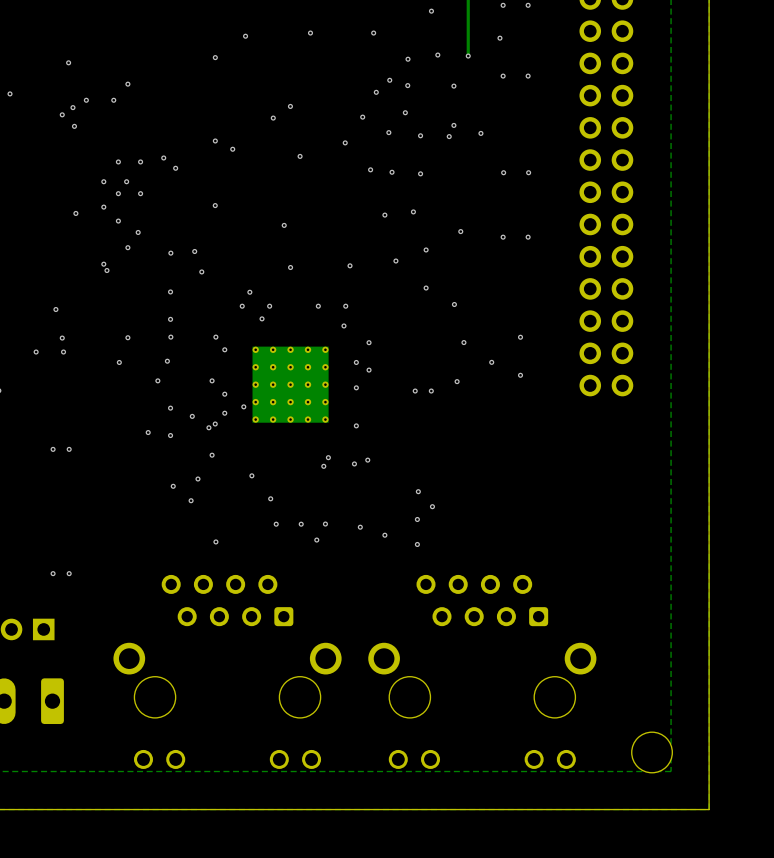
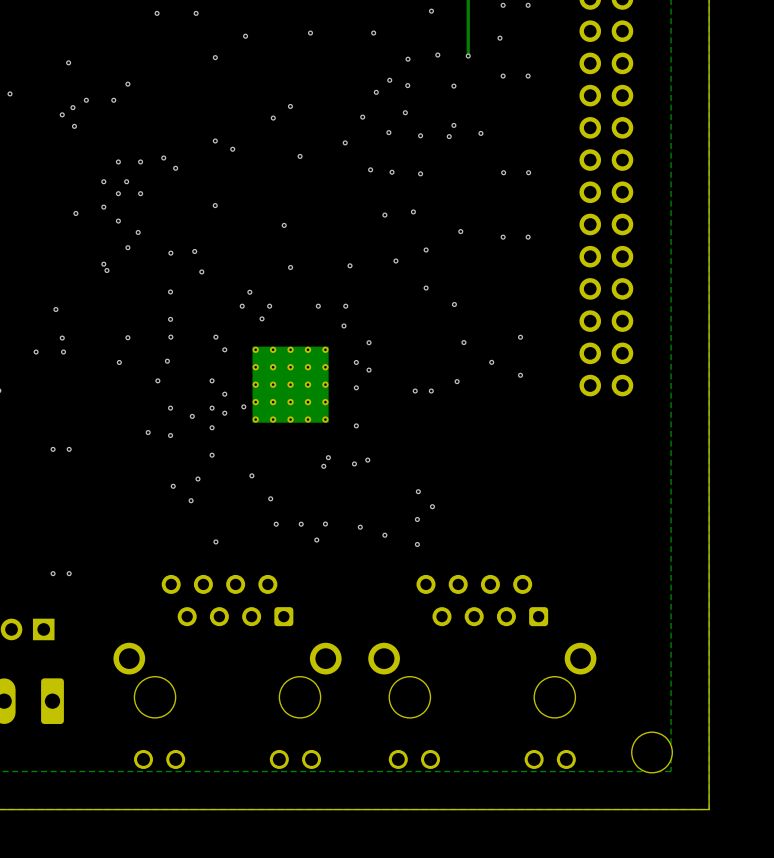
via: none -> (157, 13)
via: none -> (196, 13)
via: none -> (212, 408)
via: (215, 423) -> none
via: (208, 427) -> none
via: none -> (212, 427)

